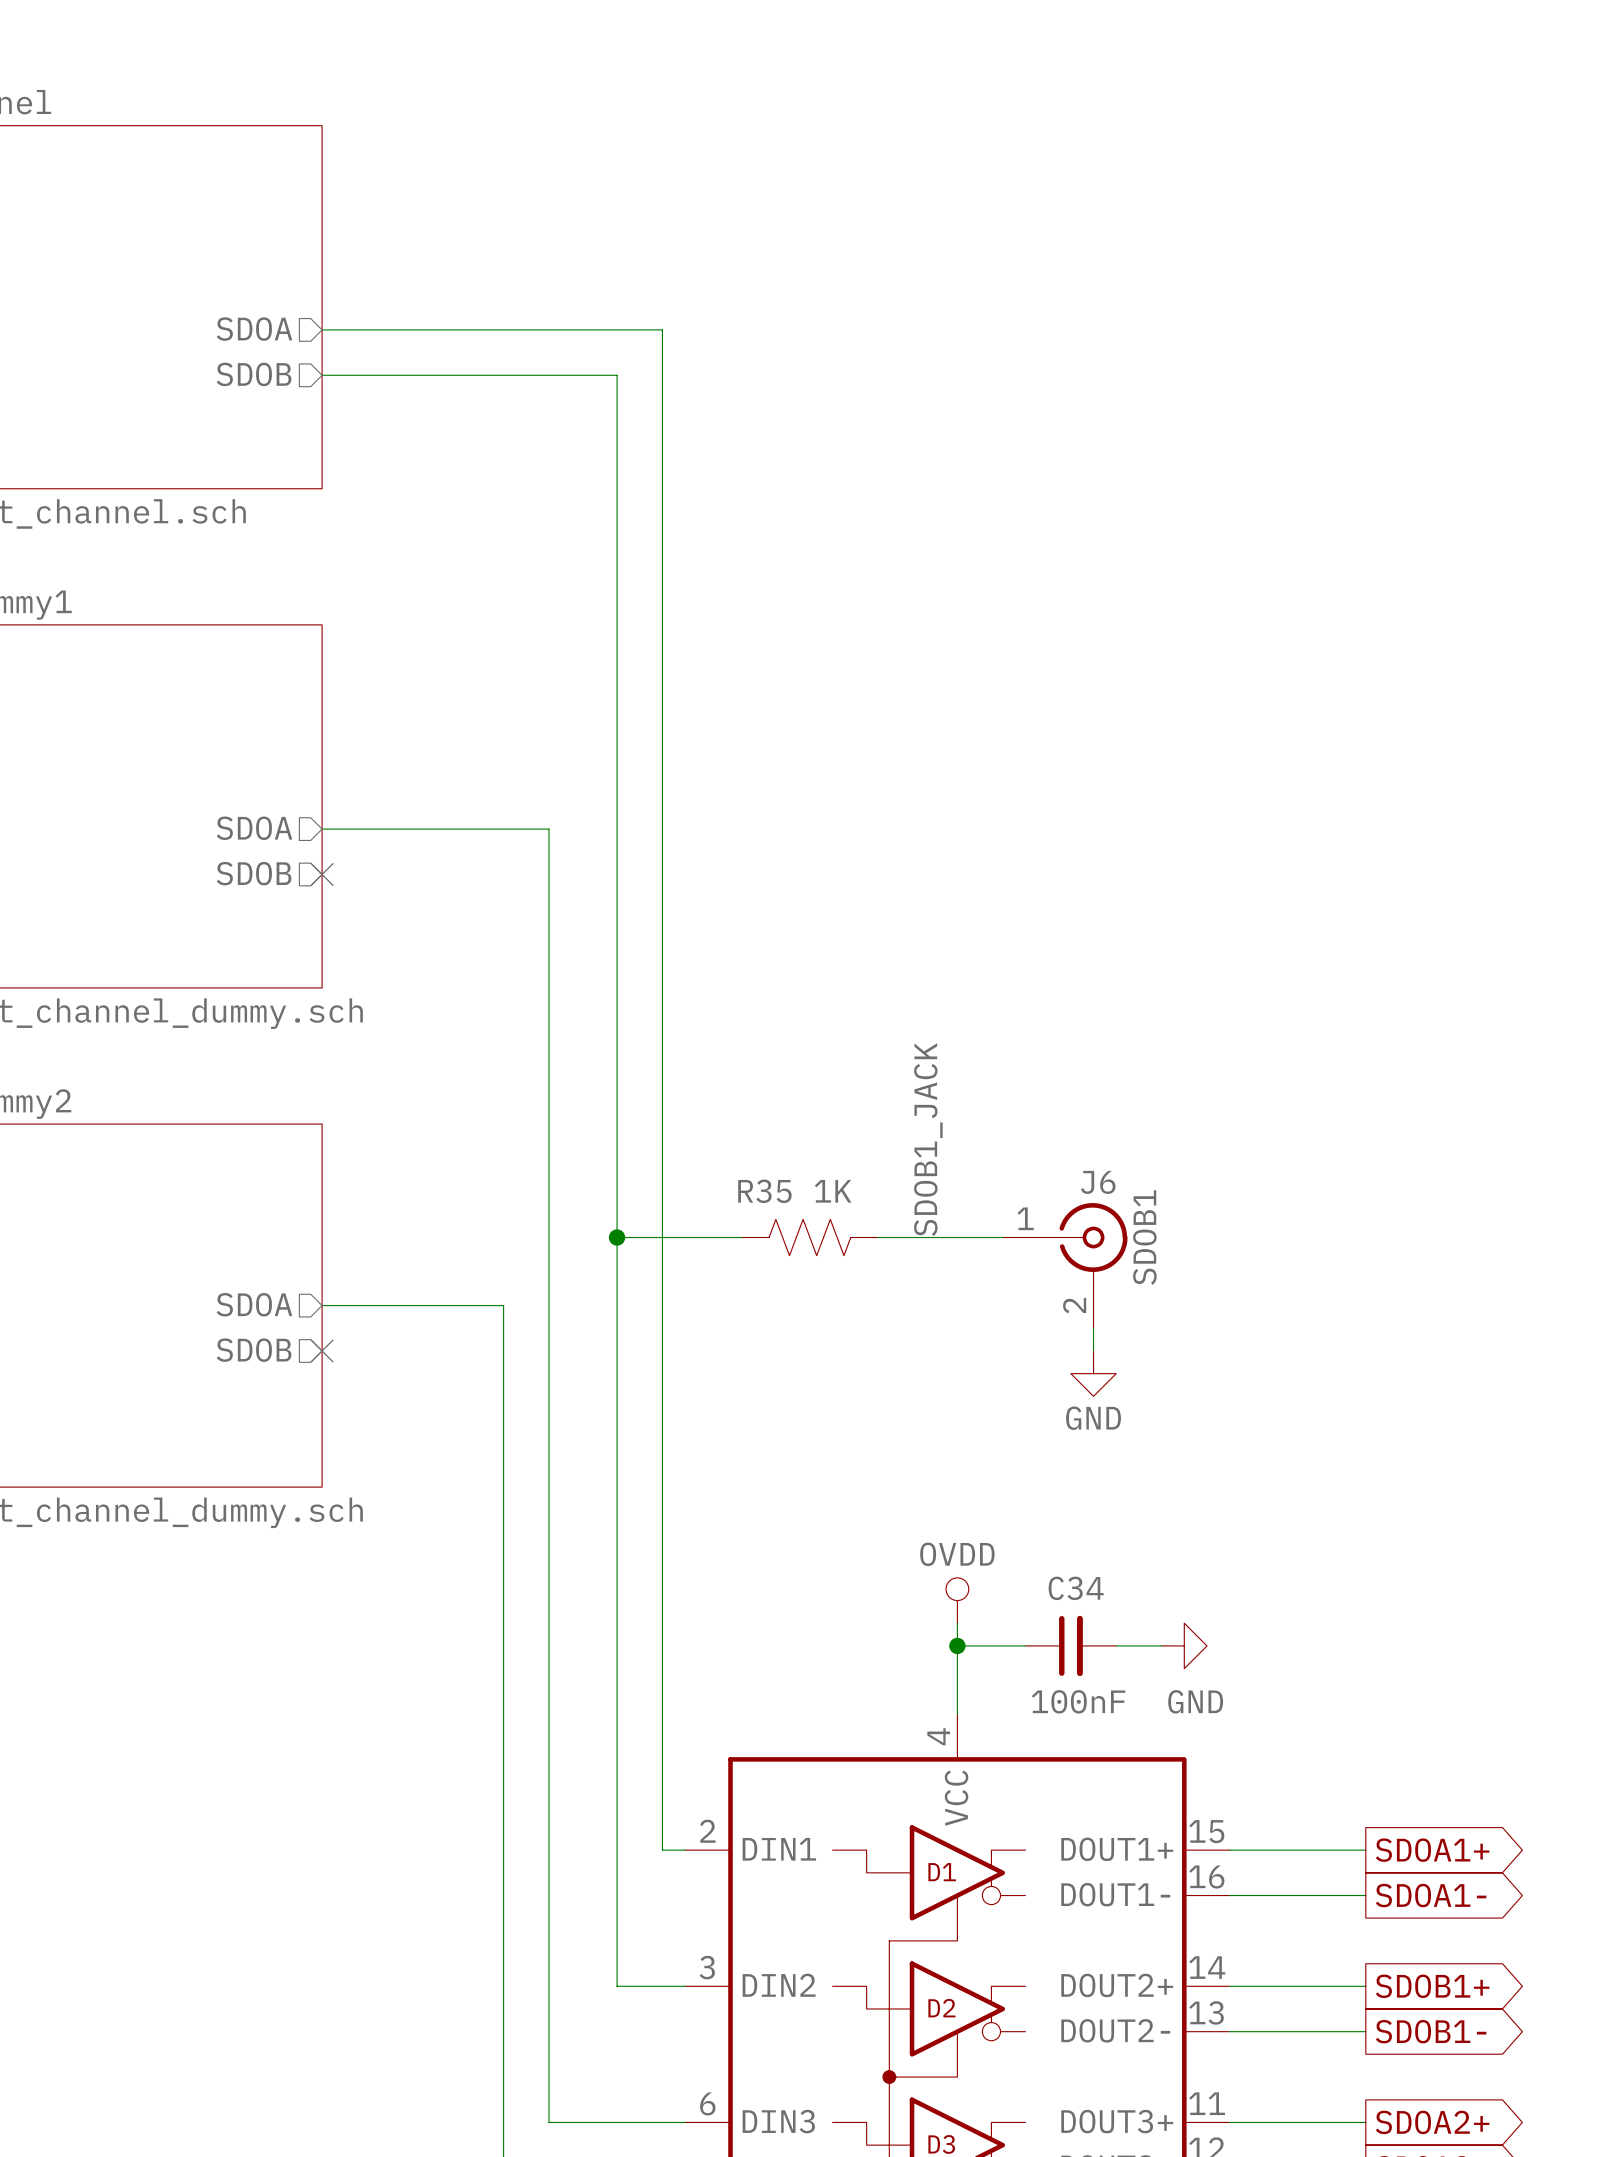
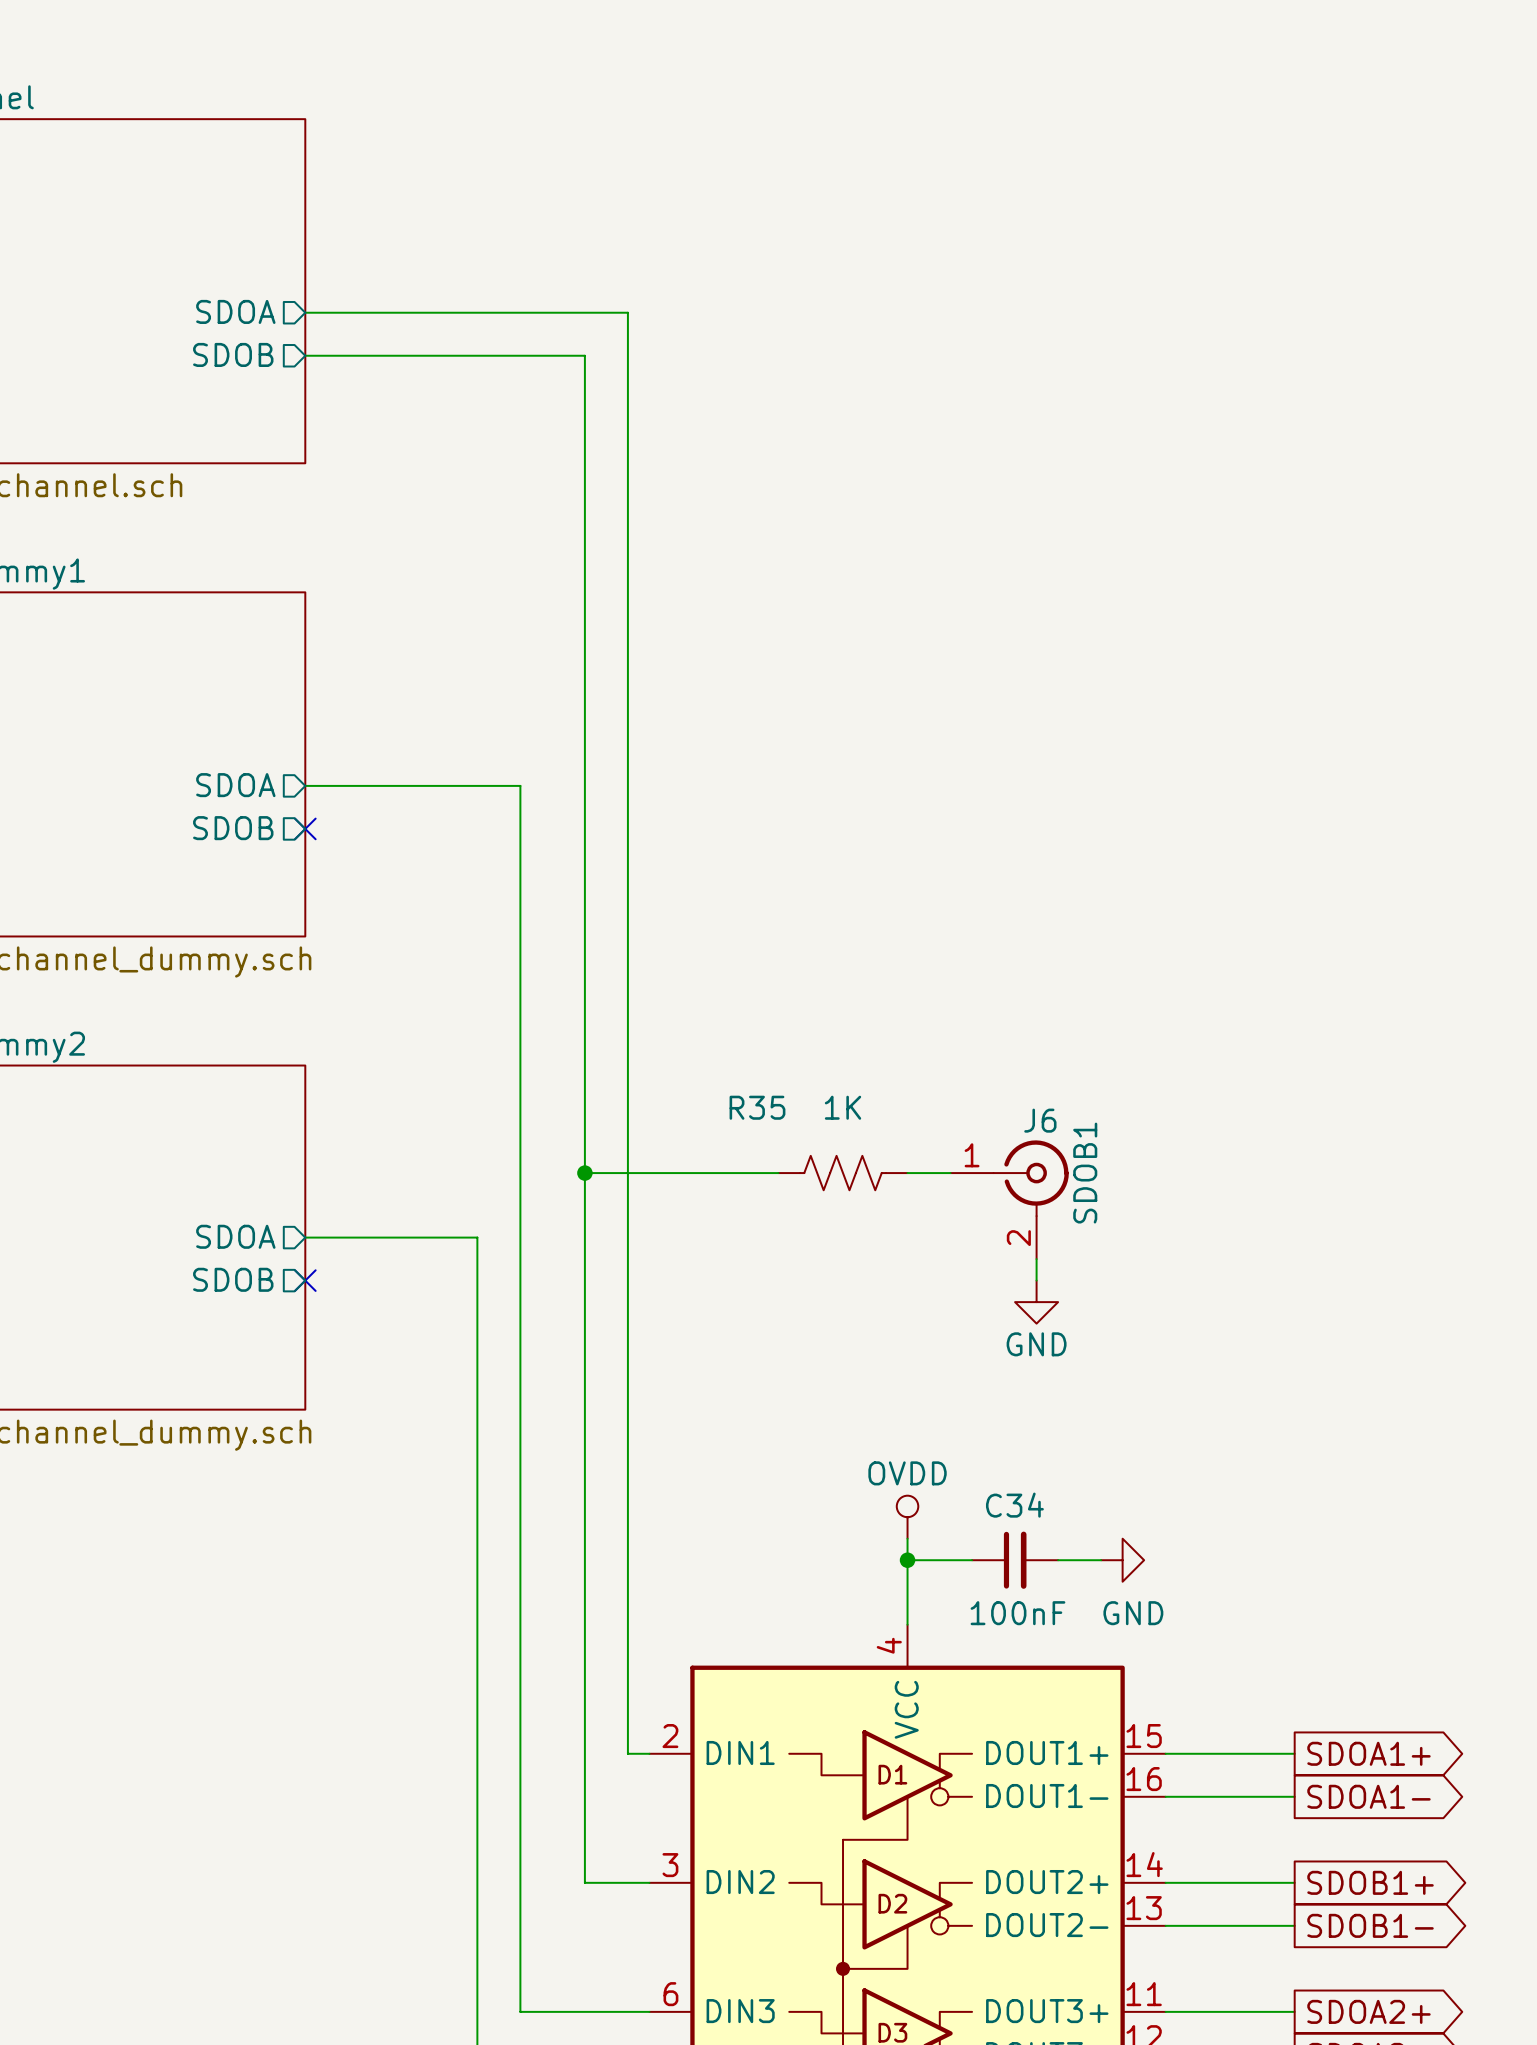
label: SDOB1_JACK (928, 1139) -> none
R35 name position: R35 (764, 1191) -> R35 (757, 1107)
R35 value position: 1K (833, 1191) -> 1K (843, 1107)
R35 position: (809, 1237) -> (843, 1173)
wire: (877, 1237) (957, 1237) -> (703, 1173) (778, 1173)

